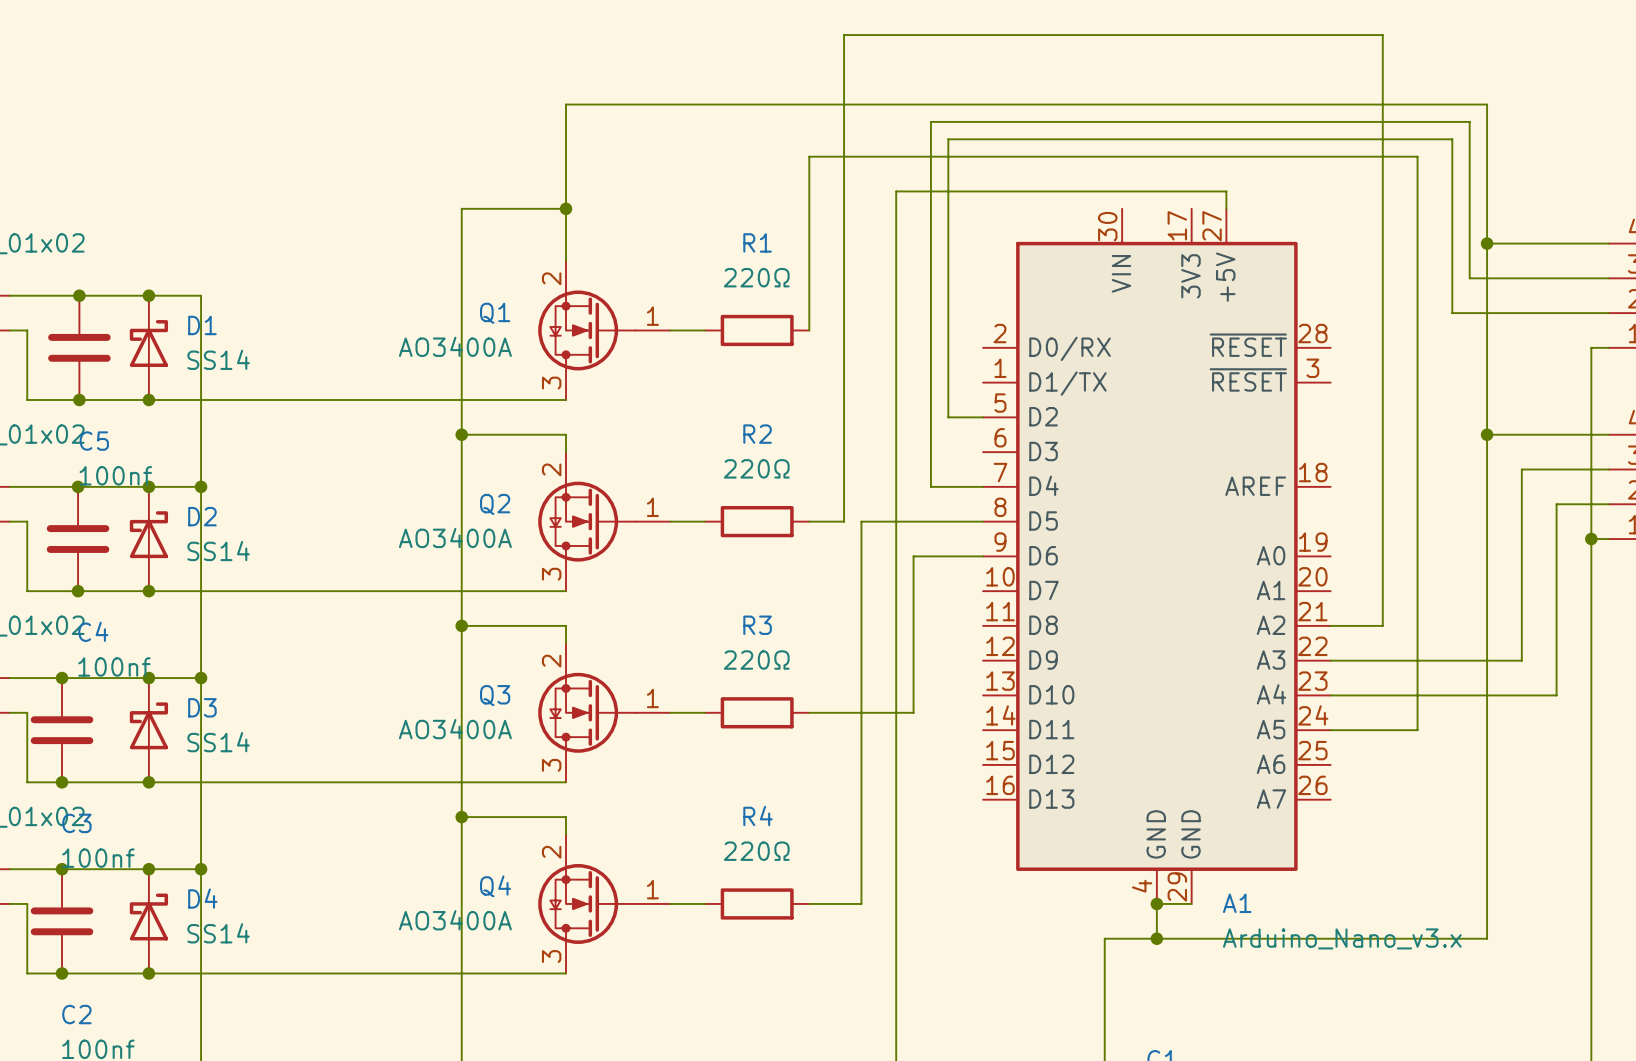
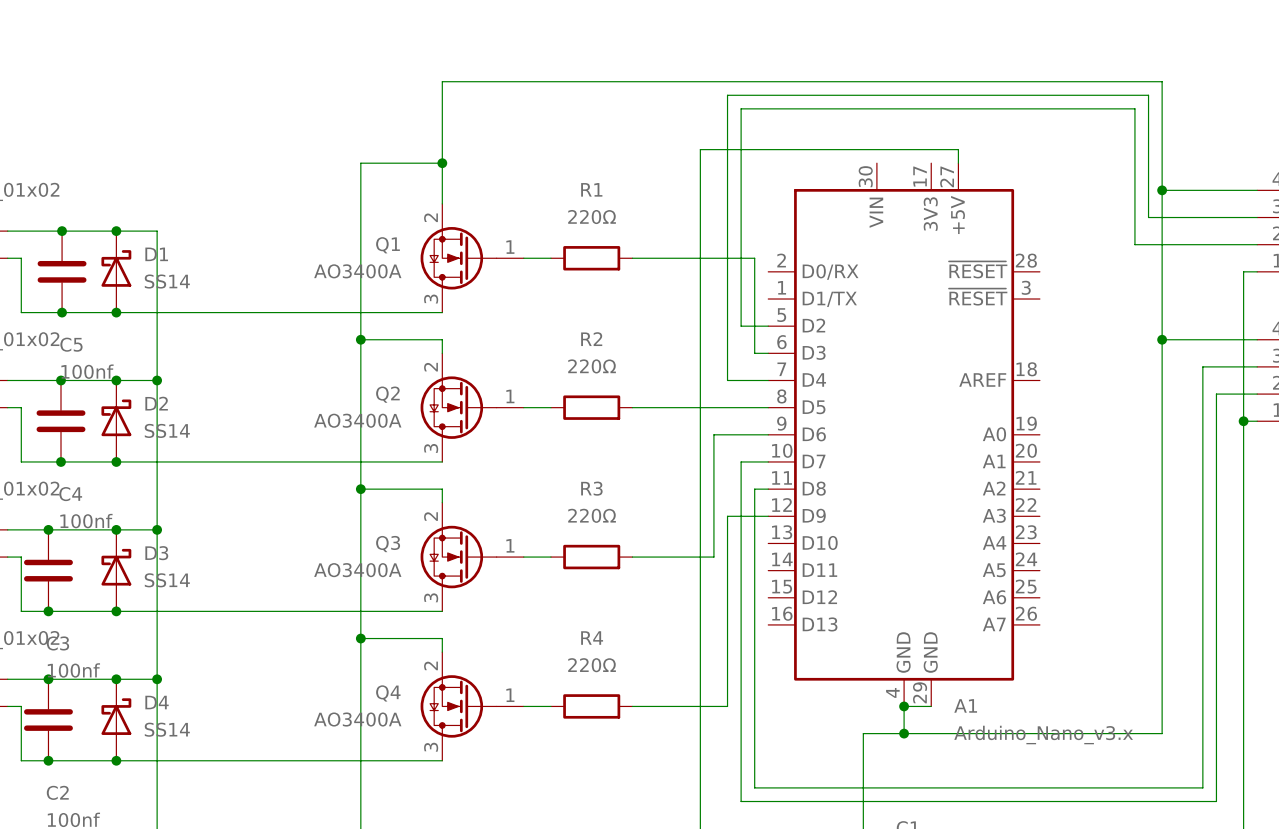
wire: (809, 330) (809, 156) (1417, 156) (1417, 730) (1330, 730) -> (632, 258) (754, 258) (754, 353) (768, 353)
wire: (1539, 469) (1521, 469) (1521, 660) (1330, 660) -> (1202, 366) (1202, 787) (754, 787) (754, 489) (768, 489)
wire: (844, 521) (844, 35) (1382, 35) (1382, 625) (1330, 625) -> (659, 407) (673, 407)
wire: (861, 521) (861, 903) -> (768, 516) (727, 516) (727, 706) (673, 706)
wire: (1330, 695) (1556, 695) -> (768, 461) (741, 461) (741, 801) (1216, 801) (1216, 543)

